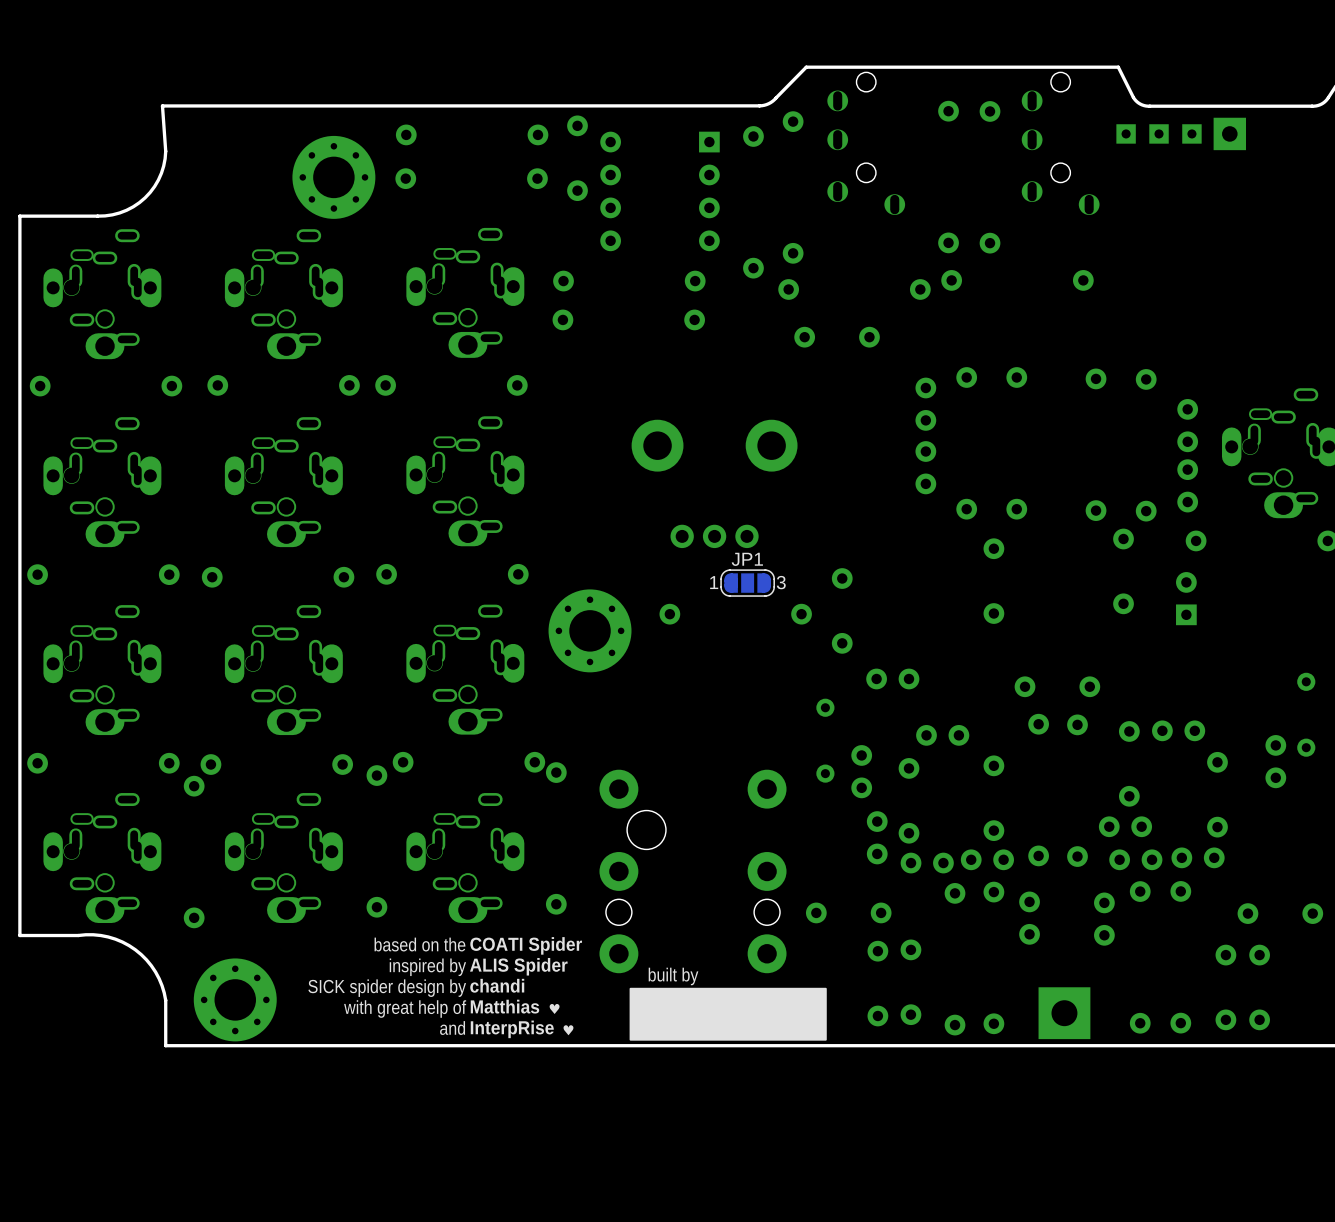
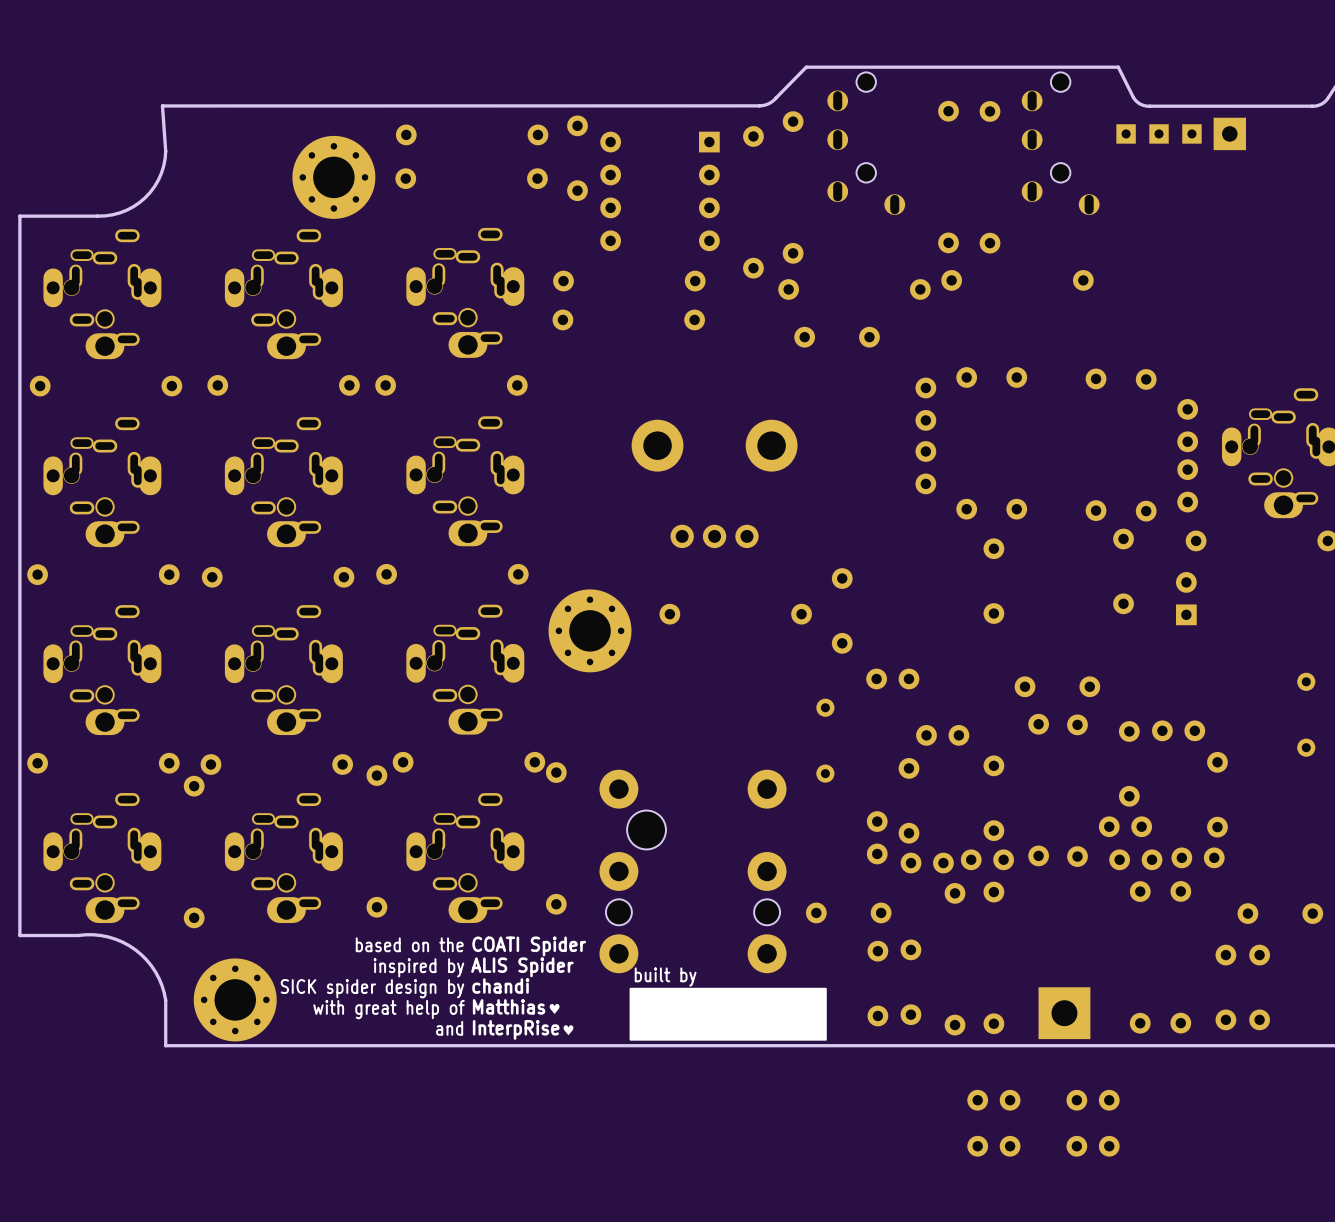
JP1: (747, 583) -> none
part: (1275, 761) -> none
part: (861, 771) -> none
part: (1029, 918) -> none
part: (1104, 919) -> none
part: none -> (993, 1100)
part: none -> (1093, 1100)
part: none -> (993, 1146)
part: none -> (1093, 1146)

